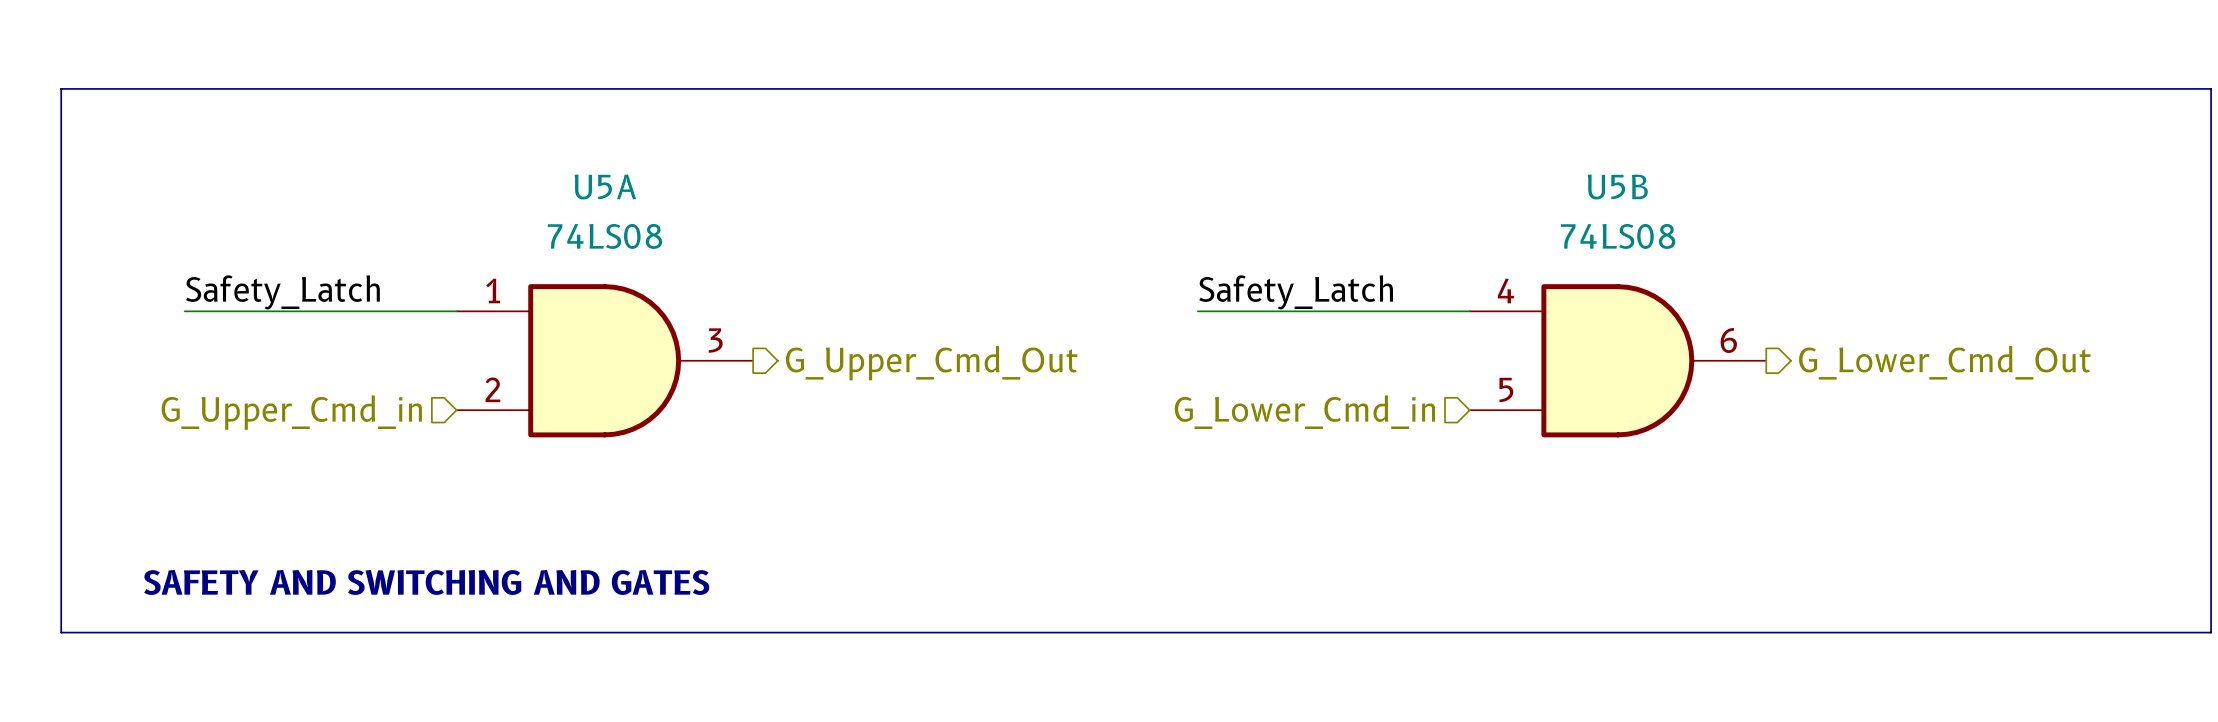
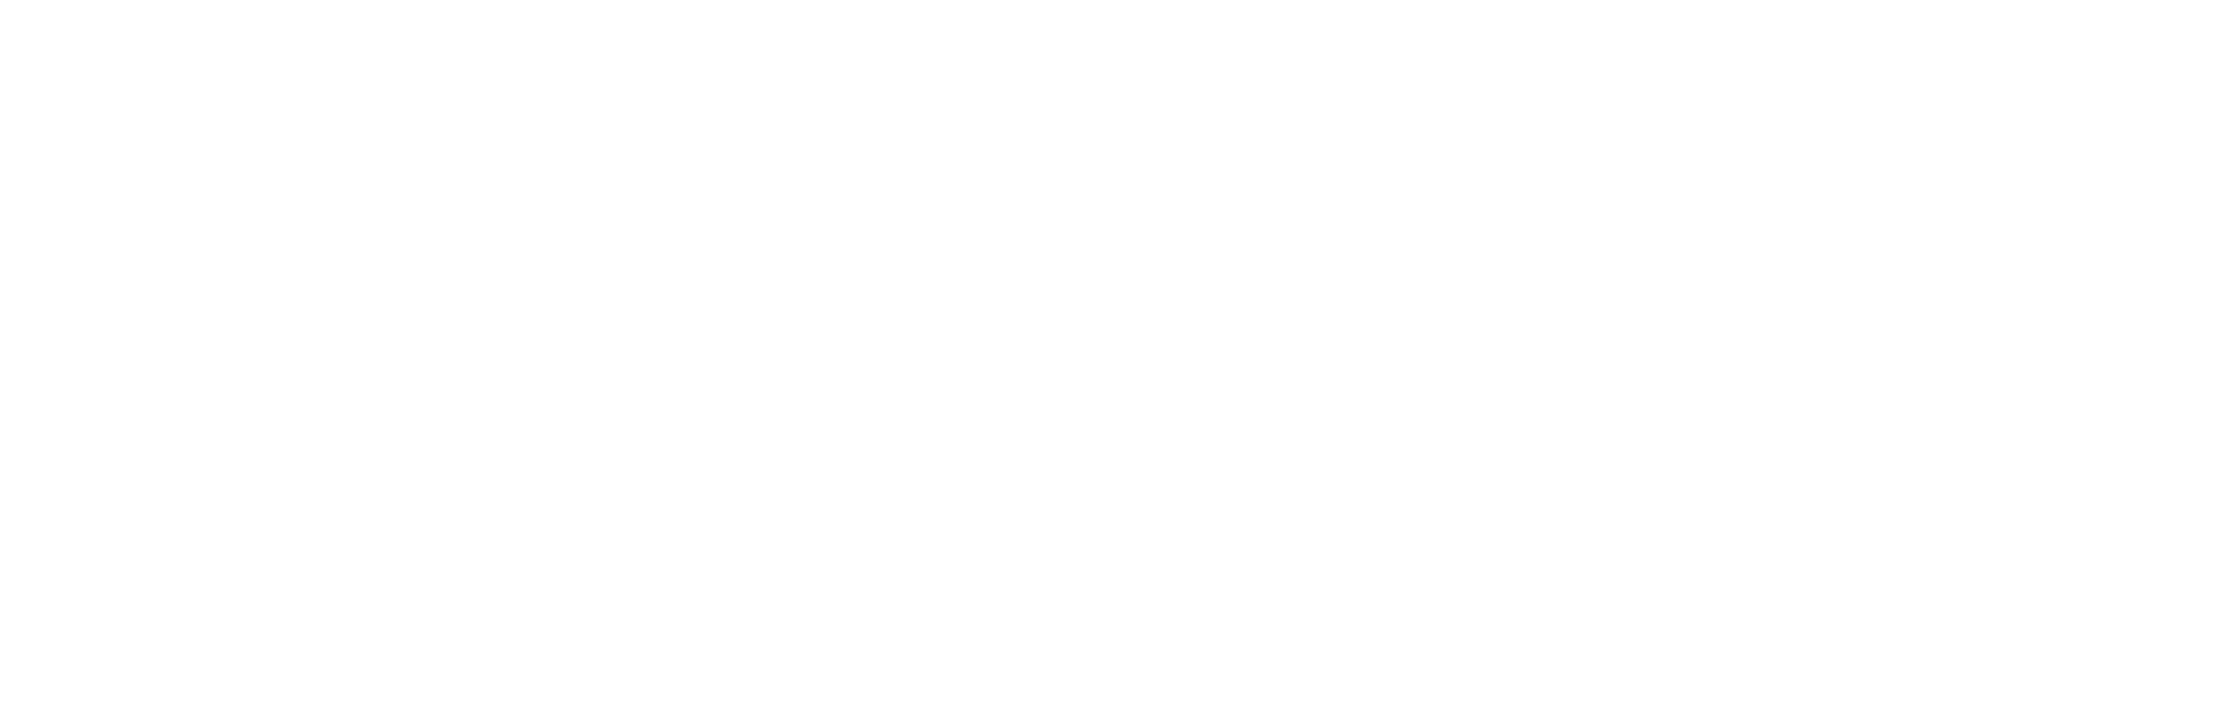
line: (61, 88) (2211, 88) (2211, 632) (61, 632) (61, 88) -> none
label: Safety_Latch (282, 292) -> none
label: Safety_Latch (1296, 292) -> none
wire: (184, 311) (456, 311) -> none
wire: (1197, 311) (1469, 311) -> none
U5A: 74LS08 (604, 360) -> none
U5B: 74LS08 (1617, 360) -> none
hierarchical label: G_Lower_Cmd_Out (1944, 362) -> none
hierarchical label: G_Upper_Cmd_Out (931, 363) -> none
hierarchical label: G_Upper_Cmd_in (291, 412) -> none
hierarchical label: G_Lower_Cmd_in (1304, 412) -> none
text: SAFETY AND SWITCHING AND GATES (426, 582) -> none

